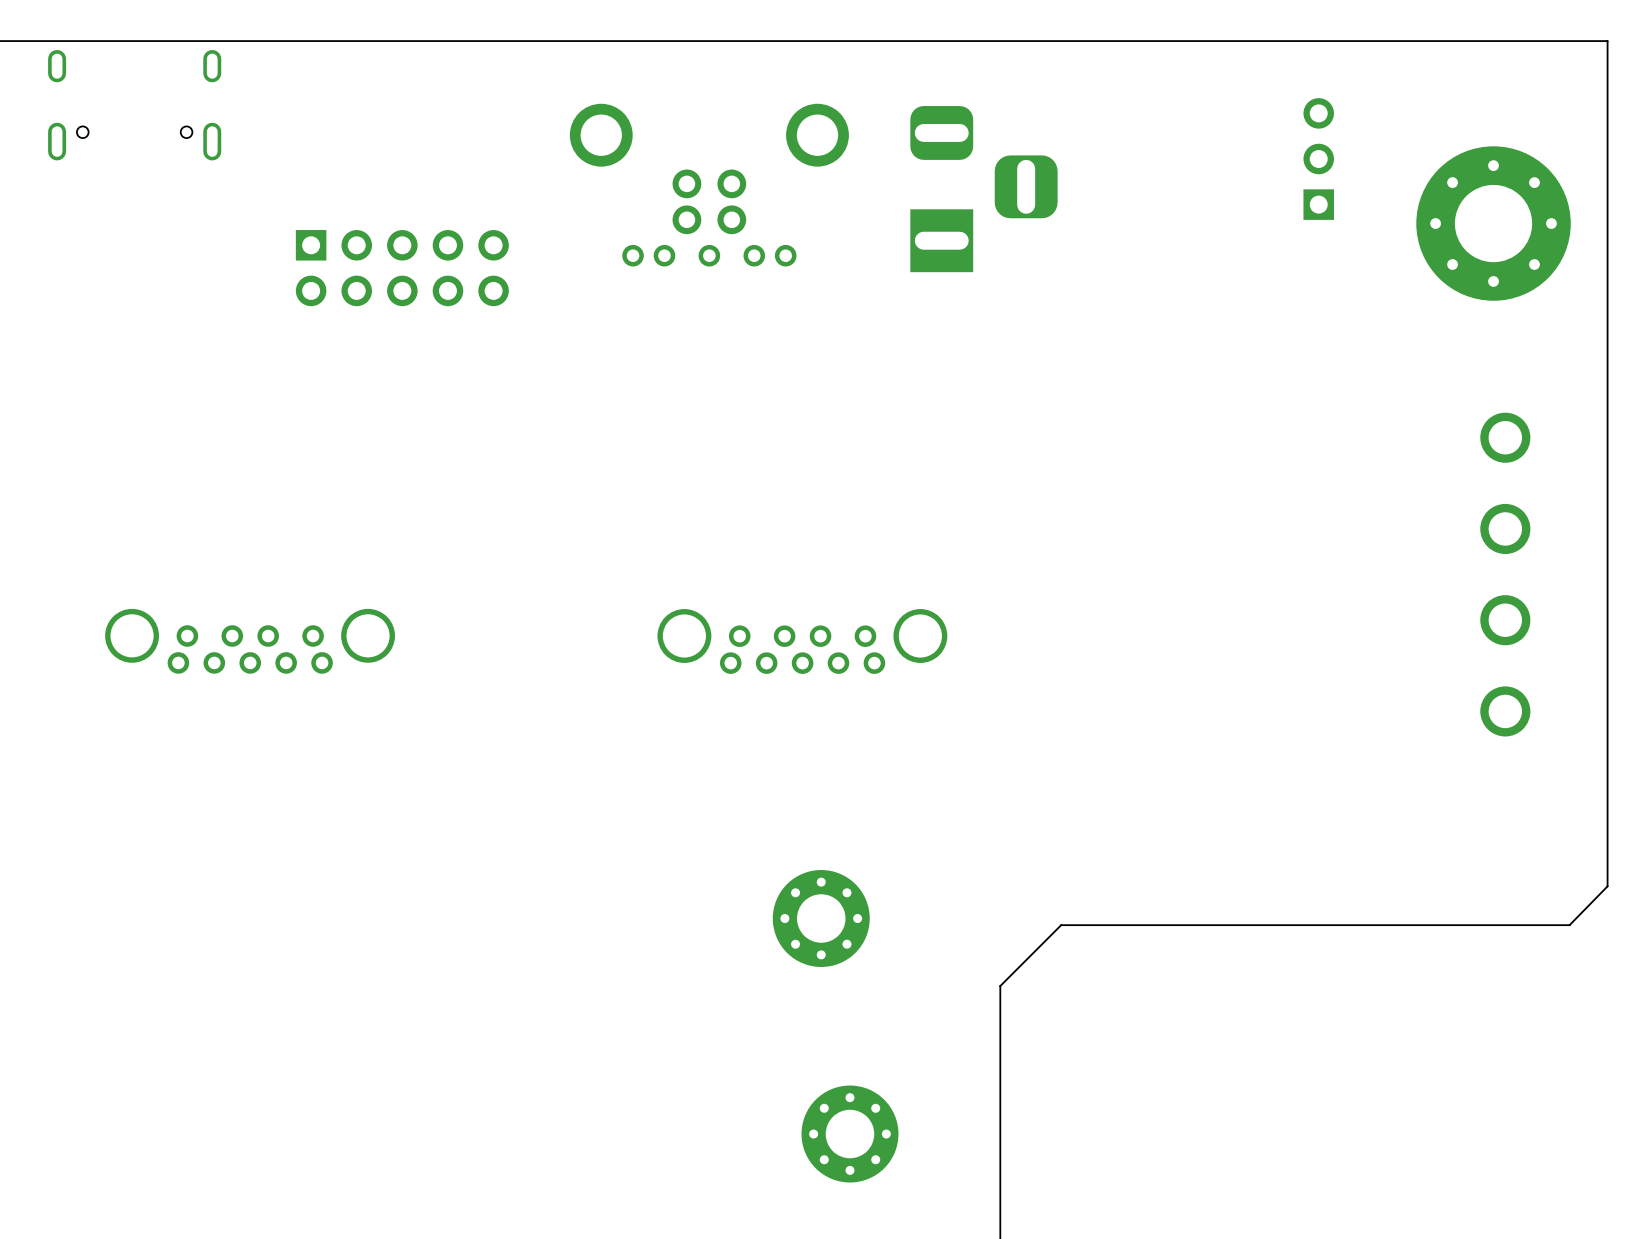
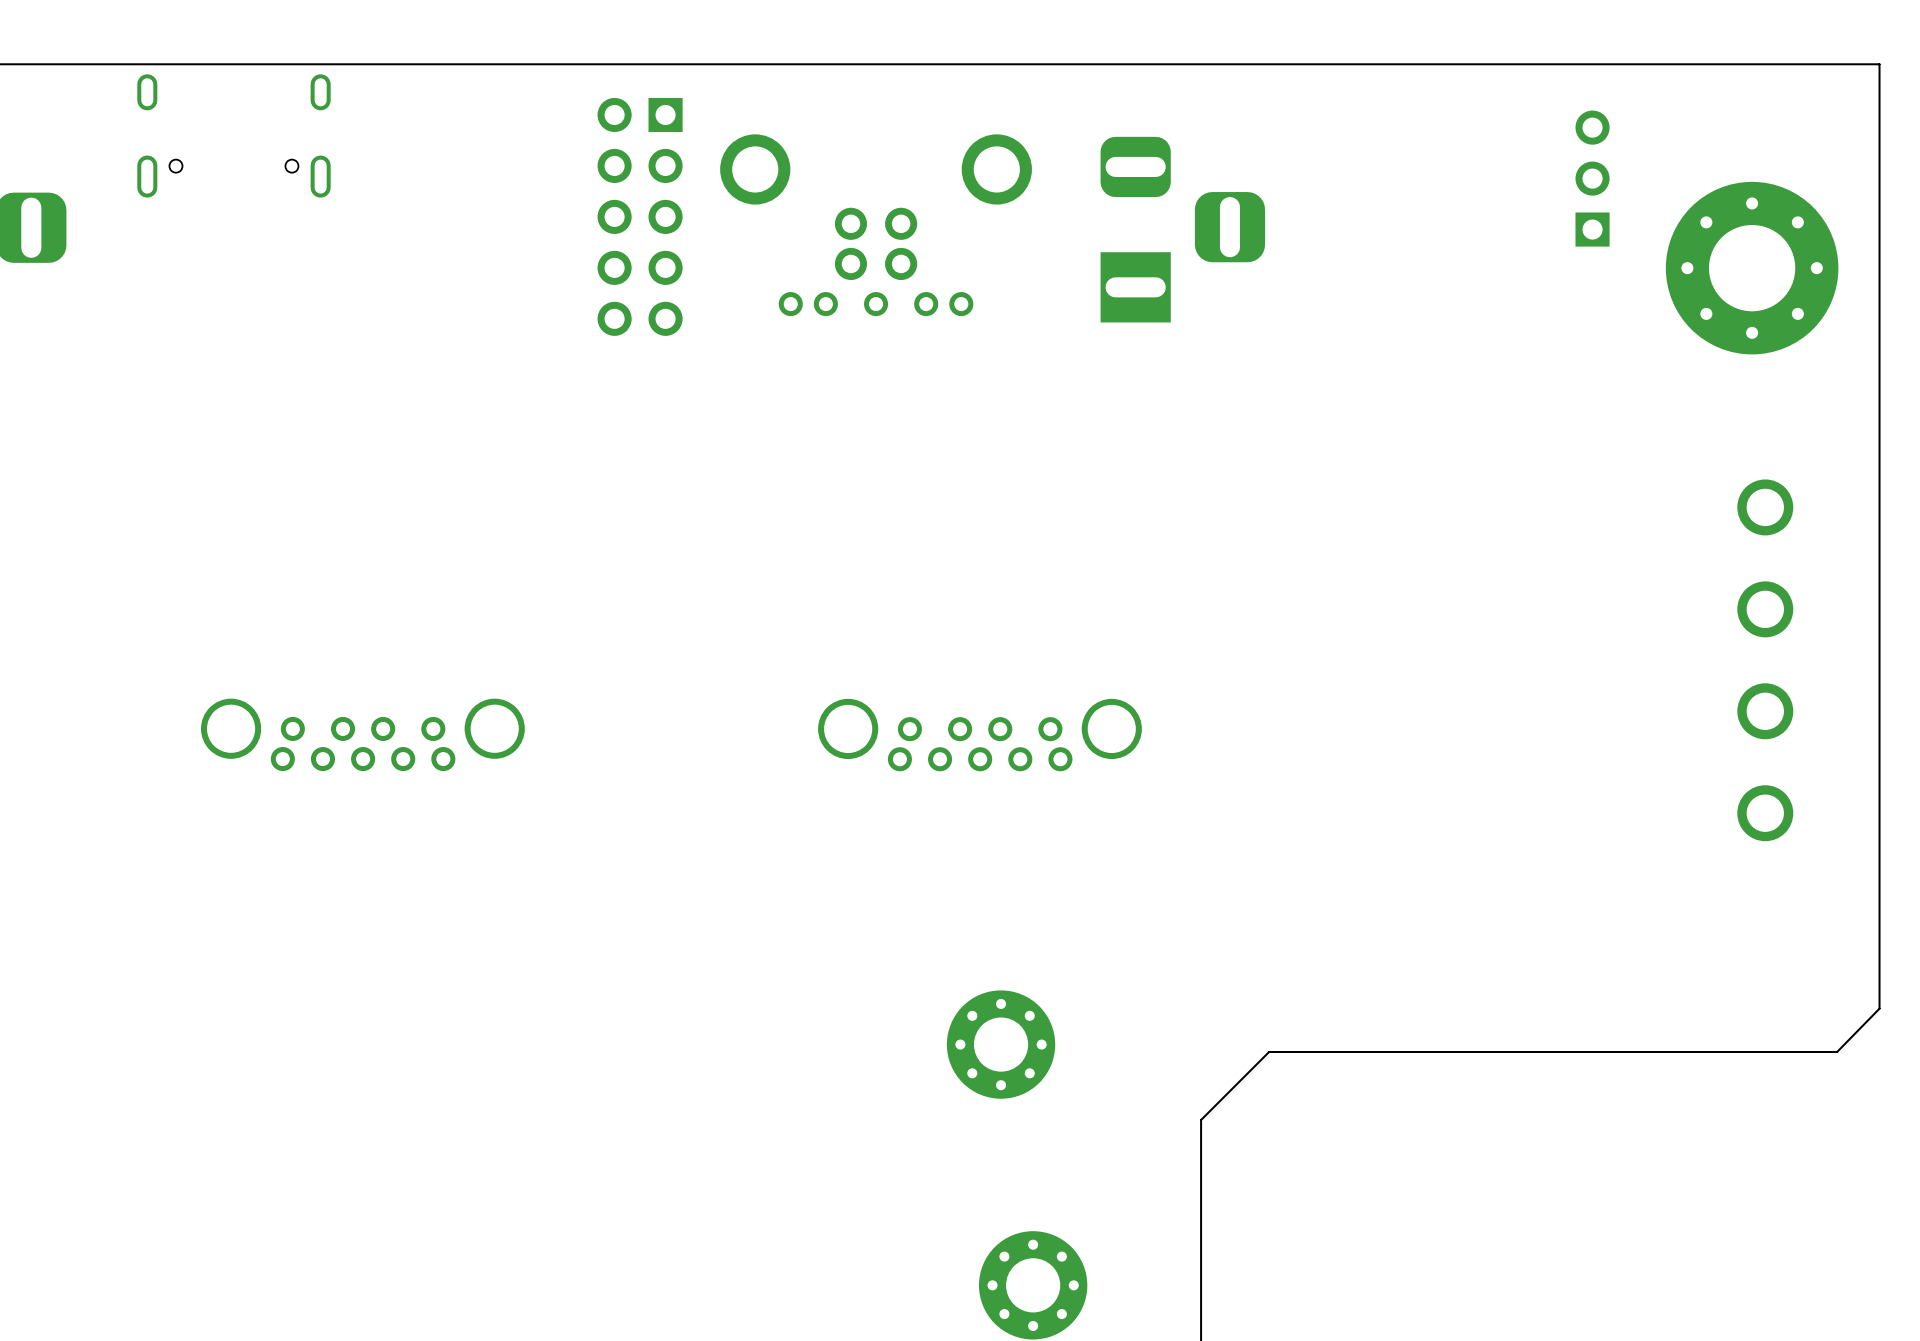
part position: (1318, 159) -> (1592, 178)
part rotation: 0° (402, 268) -> 90° clockwise (640, 216)
part position: (402, 268) -> (640, 216)

